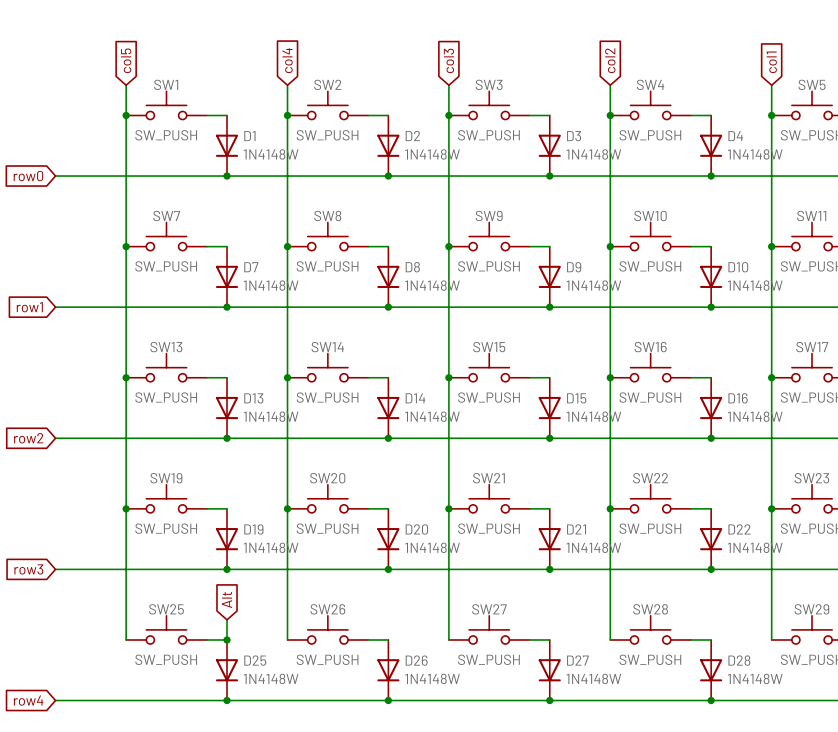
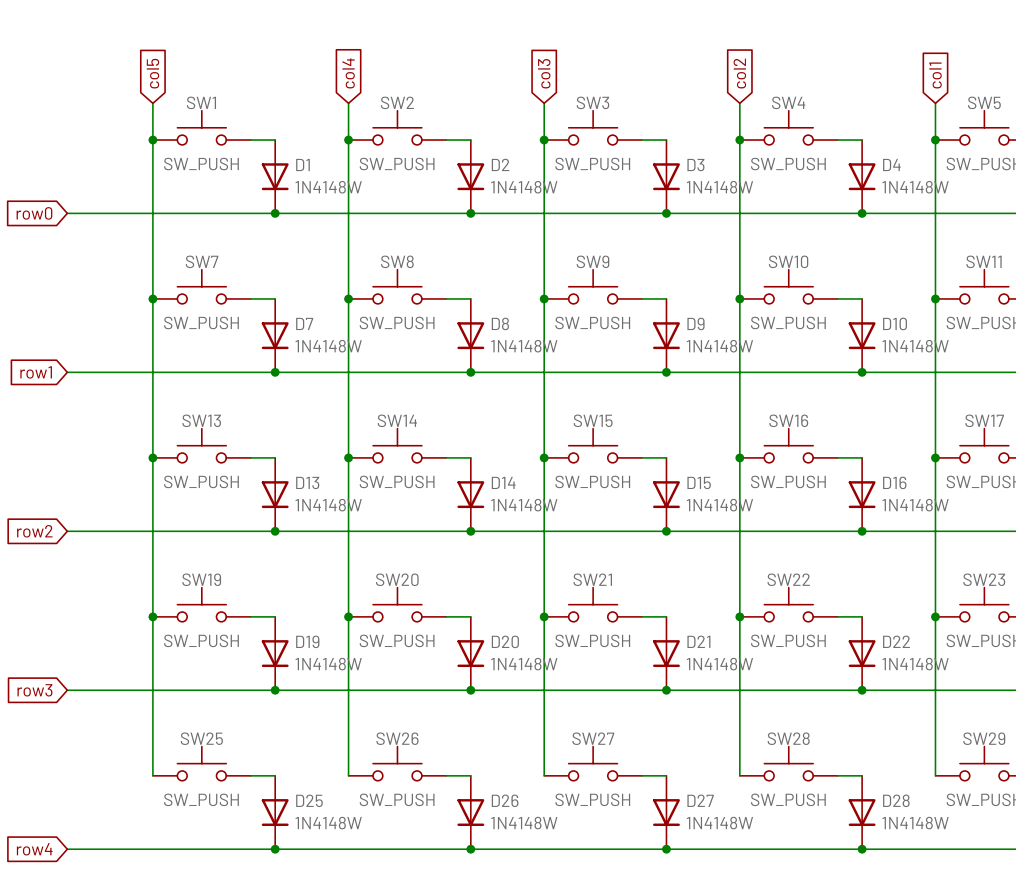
global label: Alt (227, 599) -> none
wire: (227, 619) (227, 639) -> none
junction: (227, 639) -> none

